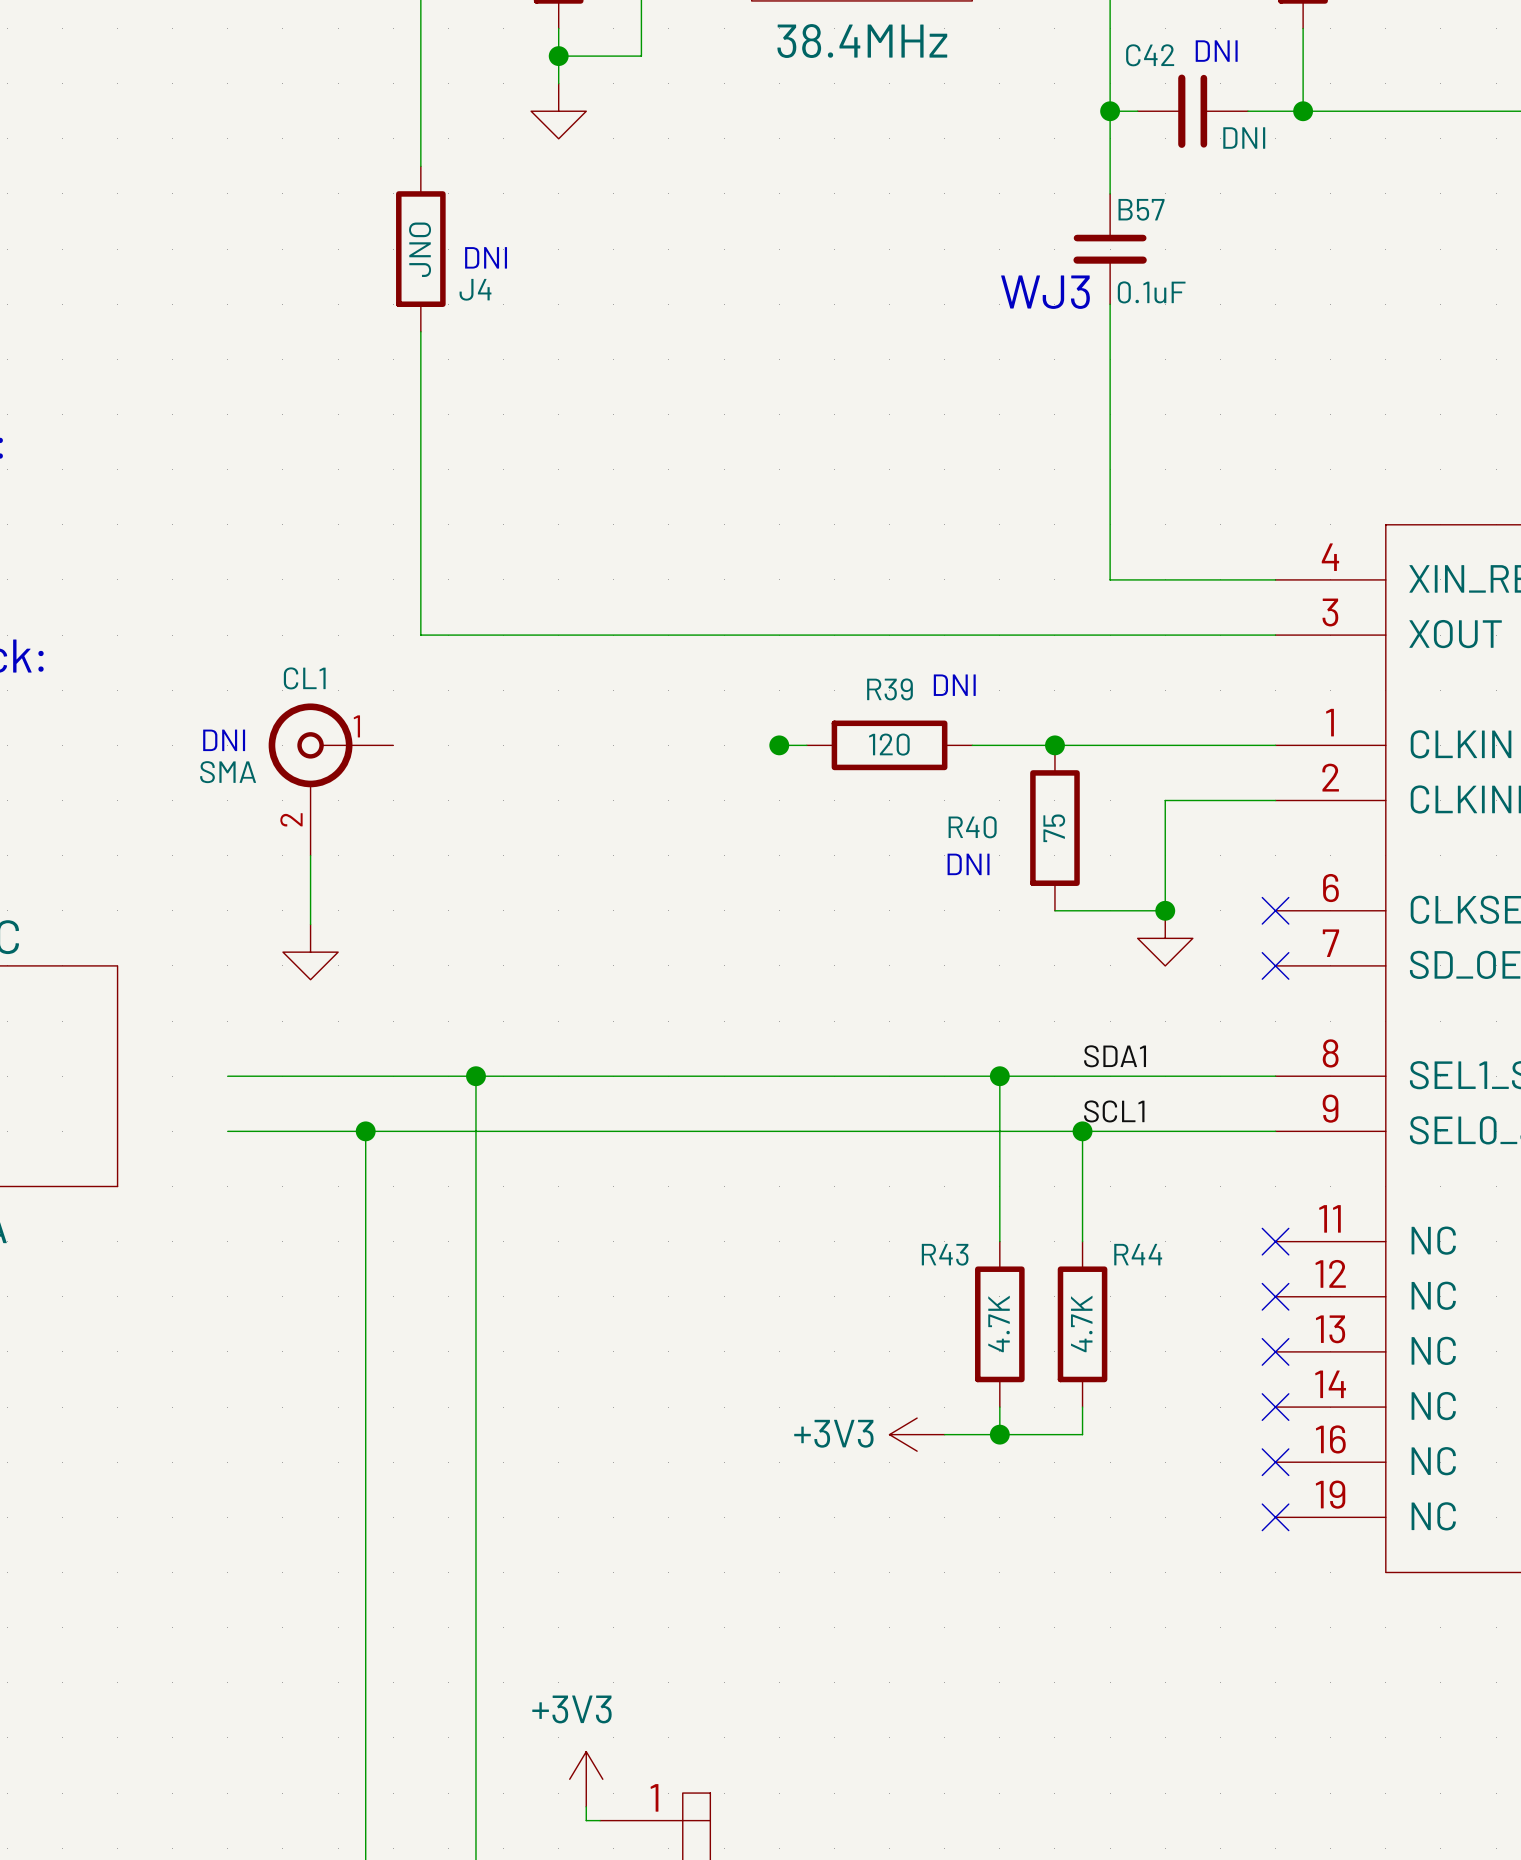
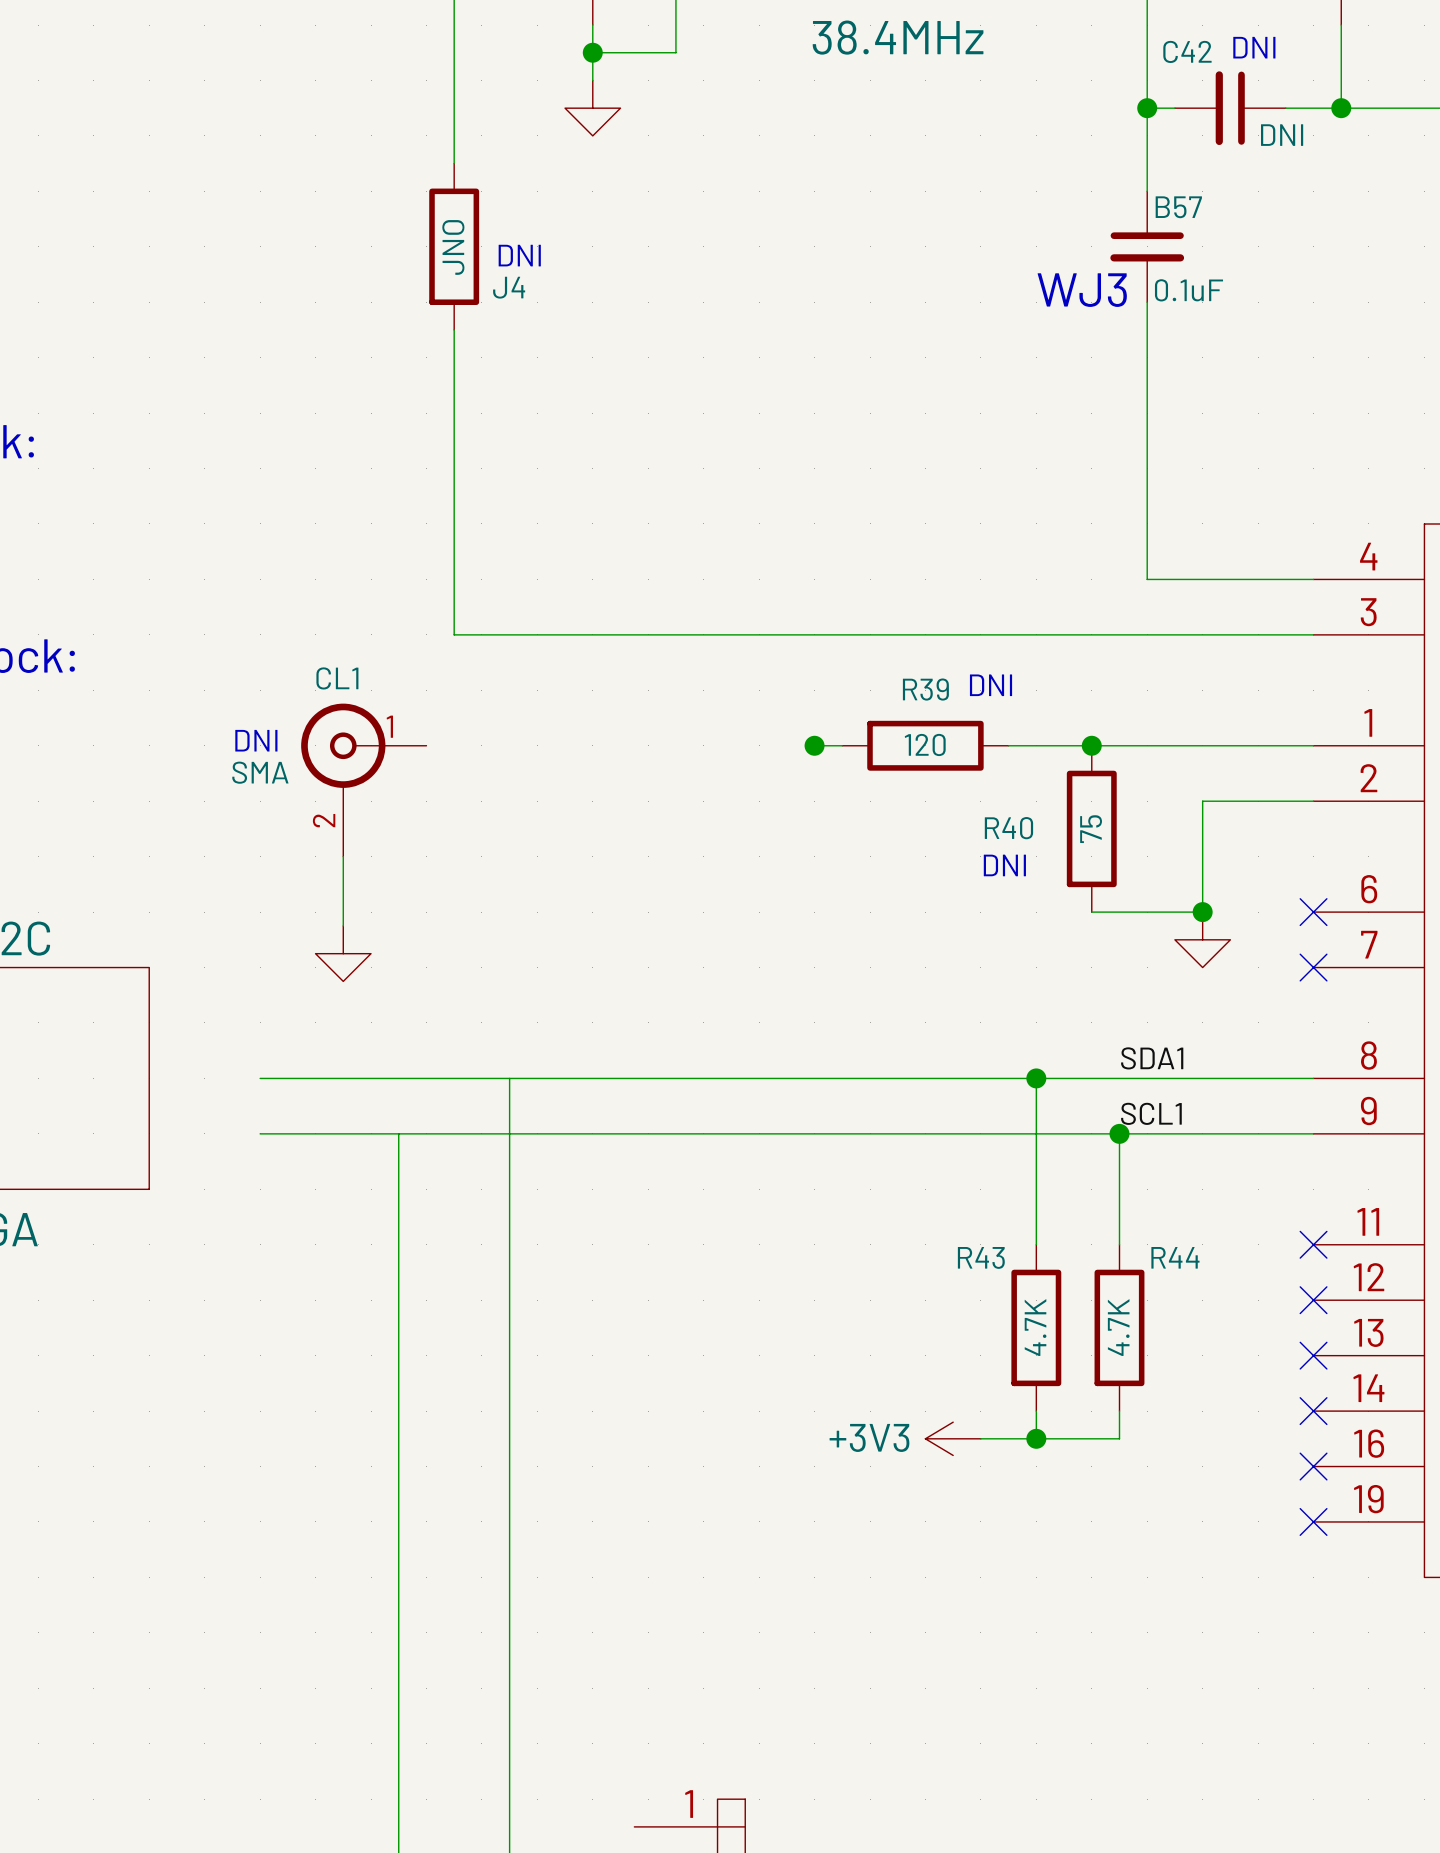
junction: (475, 1076) -> none
junction: (365, 1131) -> none
power symbol: +3V3 (586, 1779) -> none
wire: (586, 1806) (586, 1820) (600, 1820) -> none

